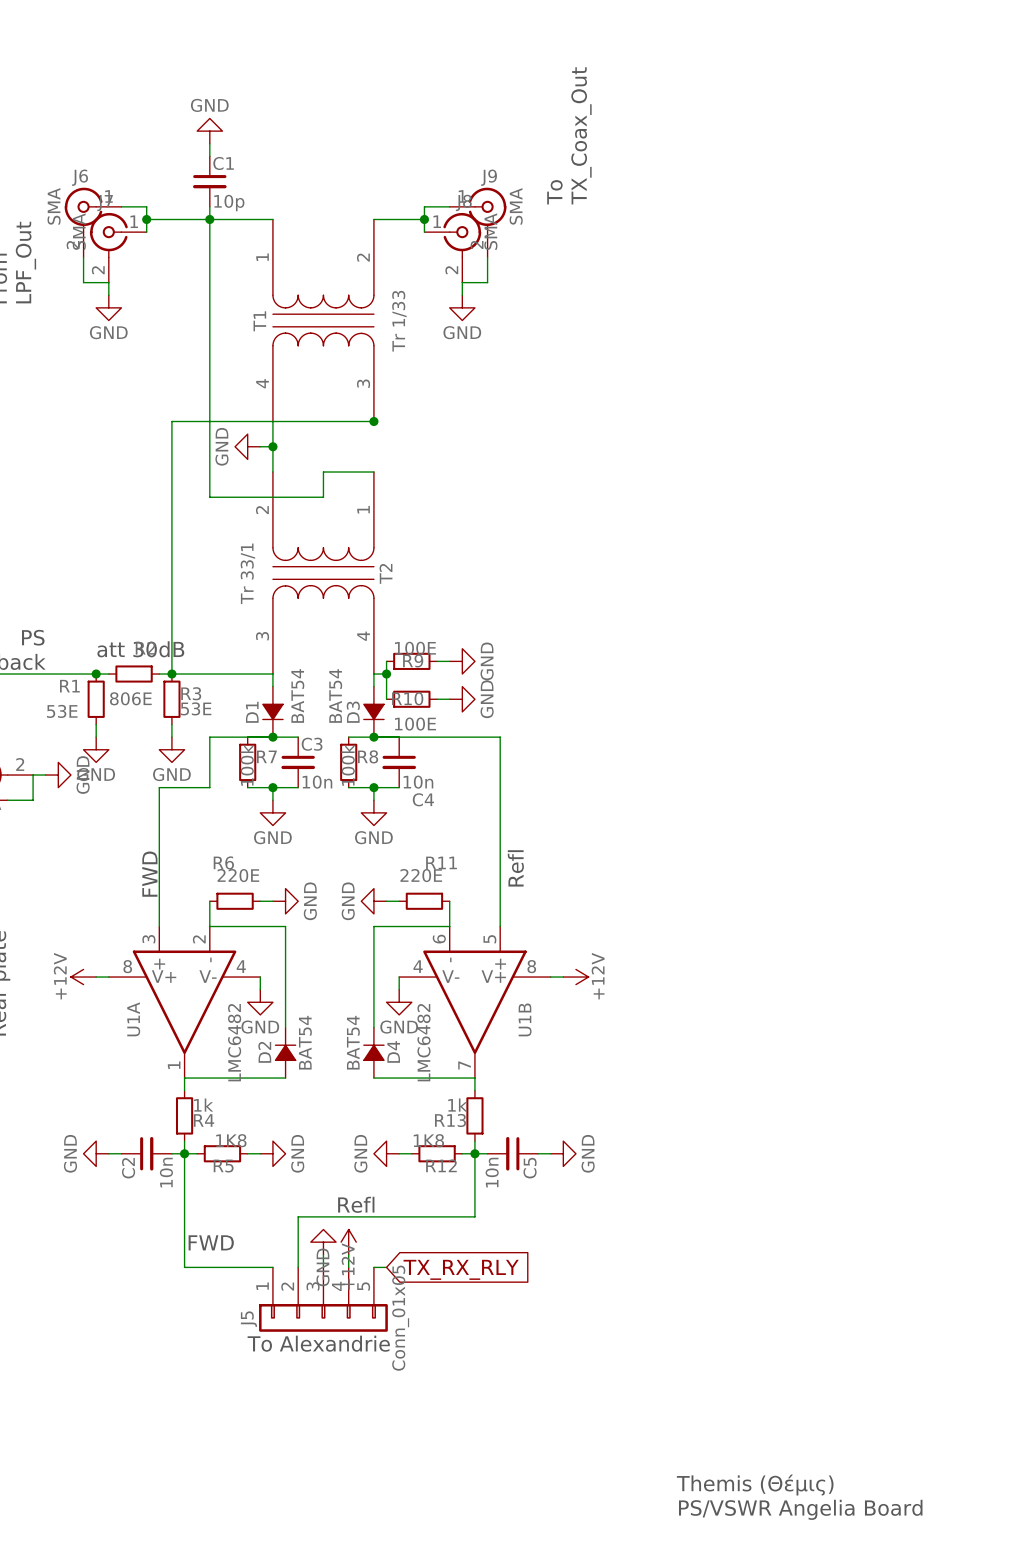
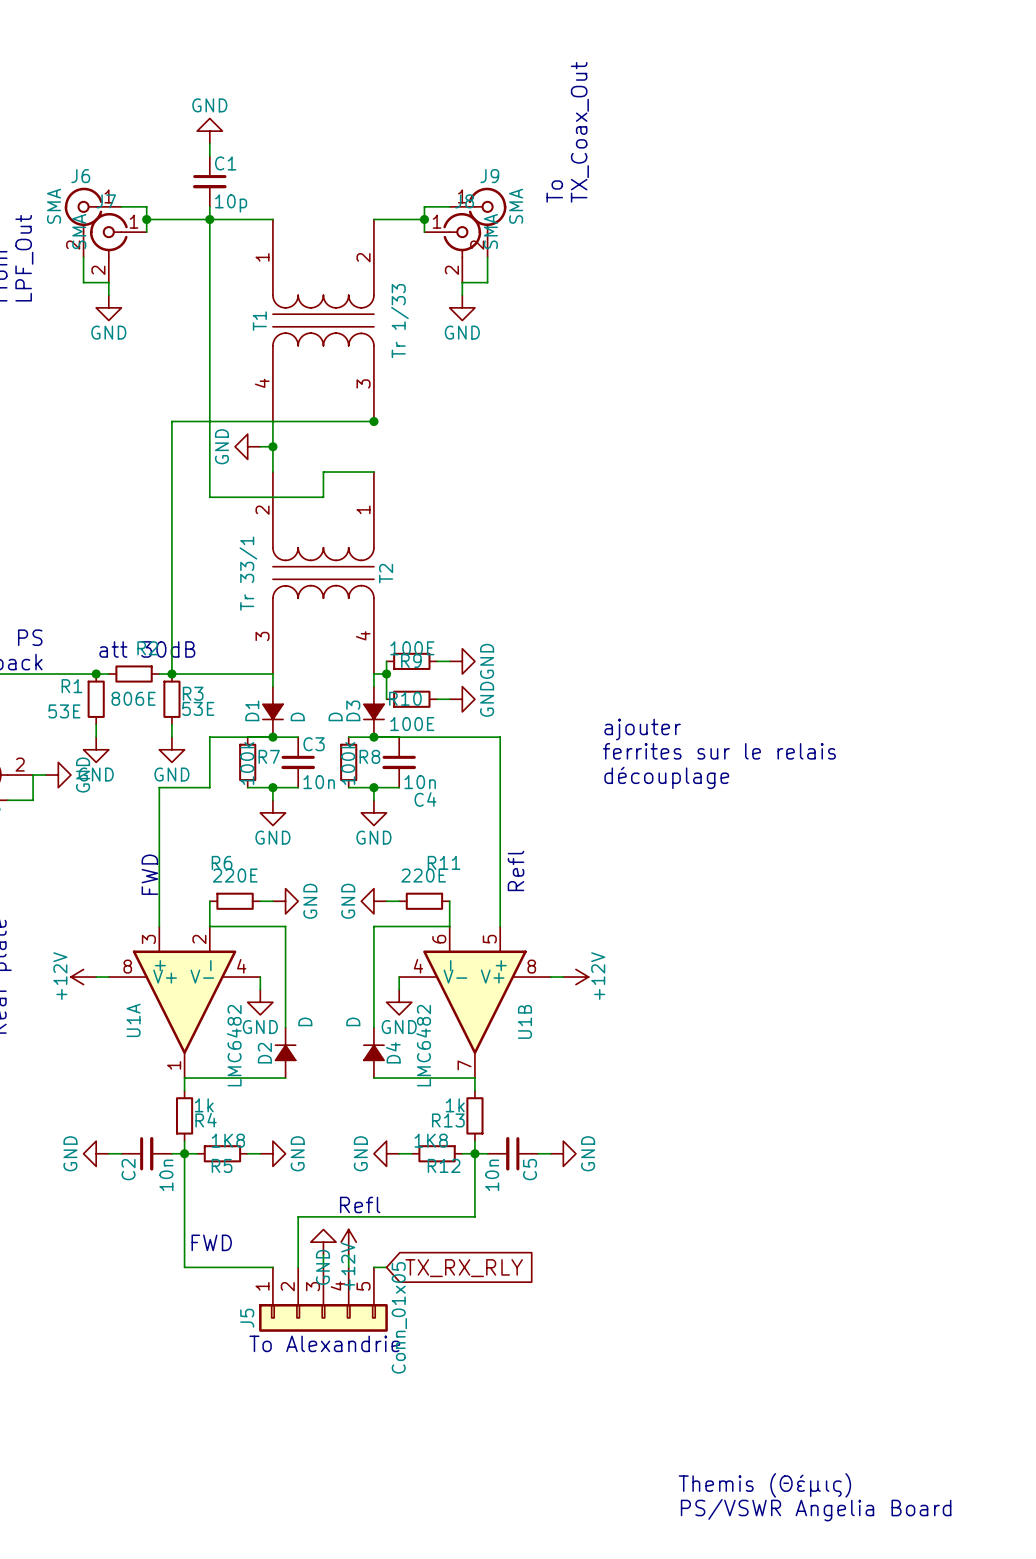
D1 value: BAT54 (297, 695) -> D (297, 716)
D3 value: BAT54 (335, 695) -> D (335, 716)
text: none -> ajouter (642, 729)
text: none -> ferrites sur le relais (719, 751)
text: none -> découplage (666, 777)
D2 value: BAT54 (305, 1042) -> D (305, 1021)
D4 value: BAT54 (353, 1042) -> D (353, 1021)

